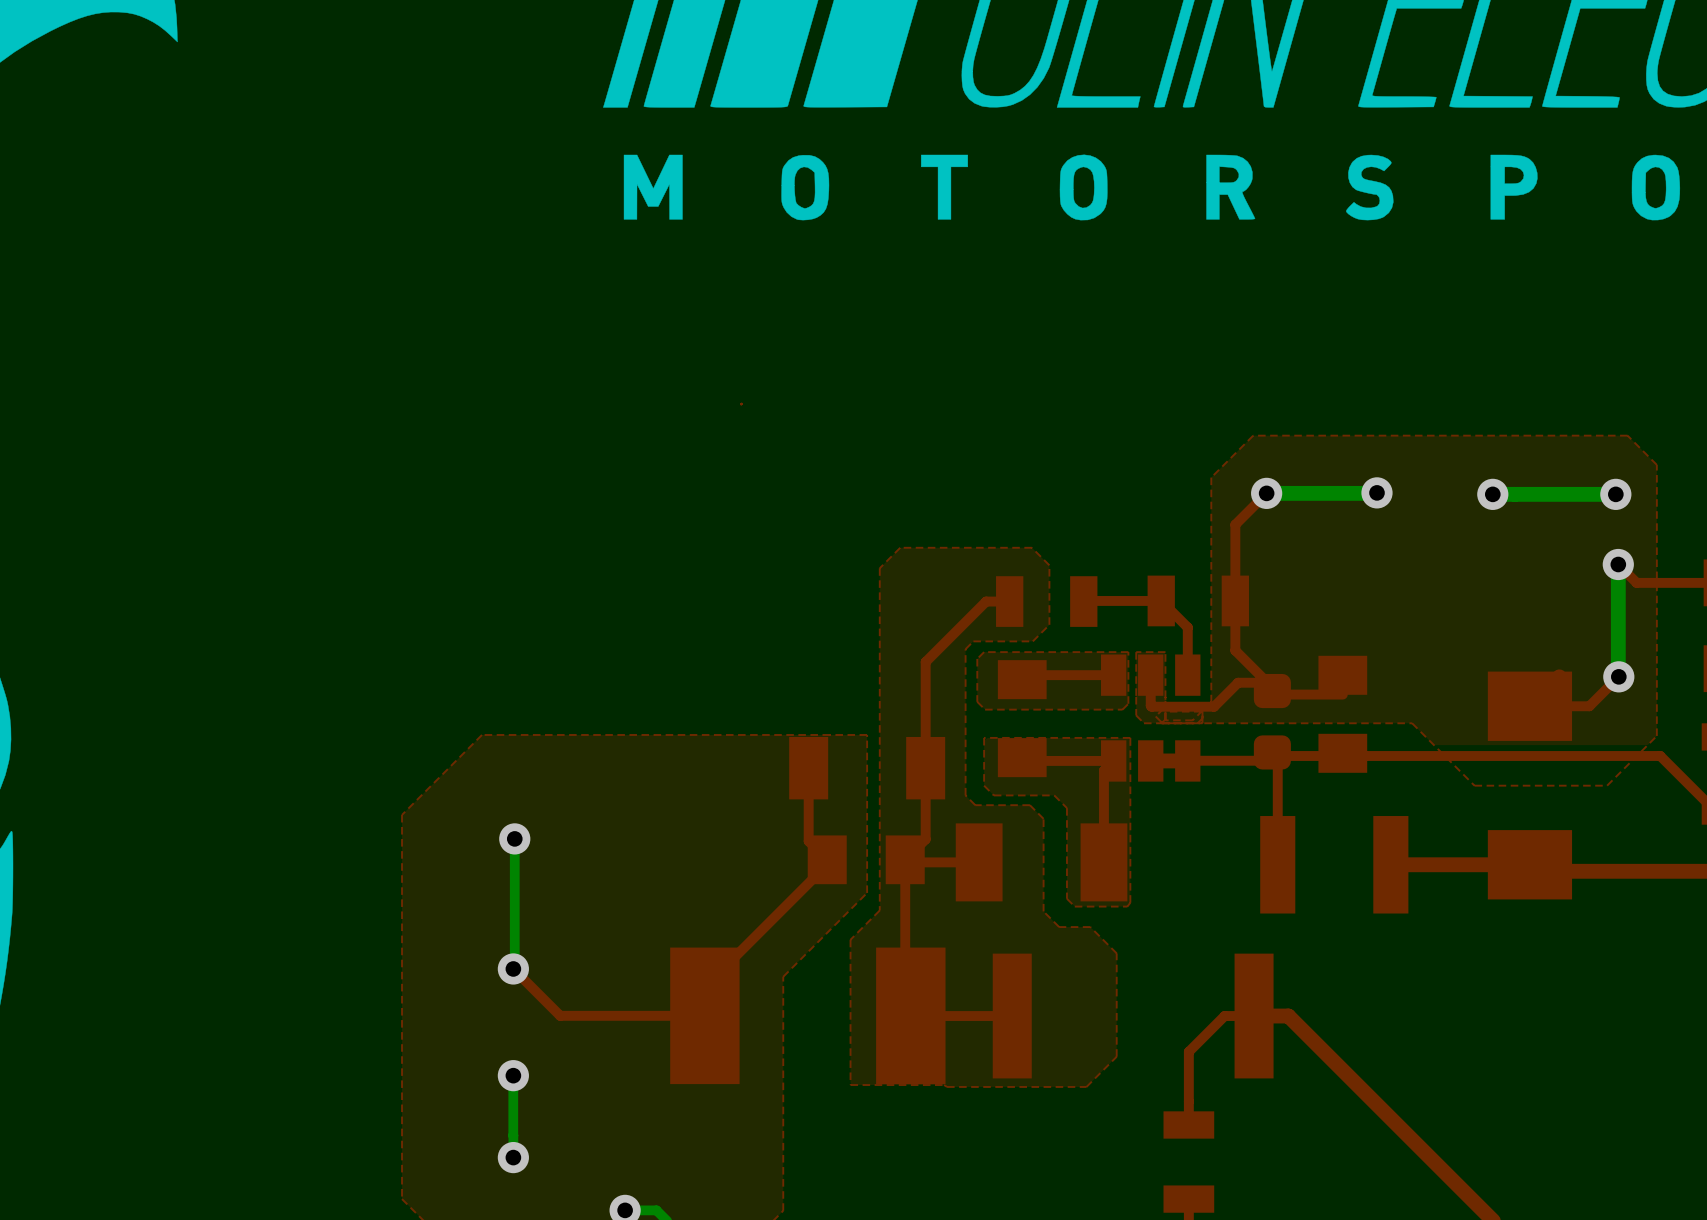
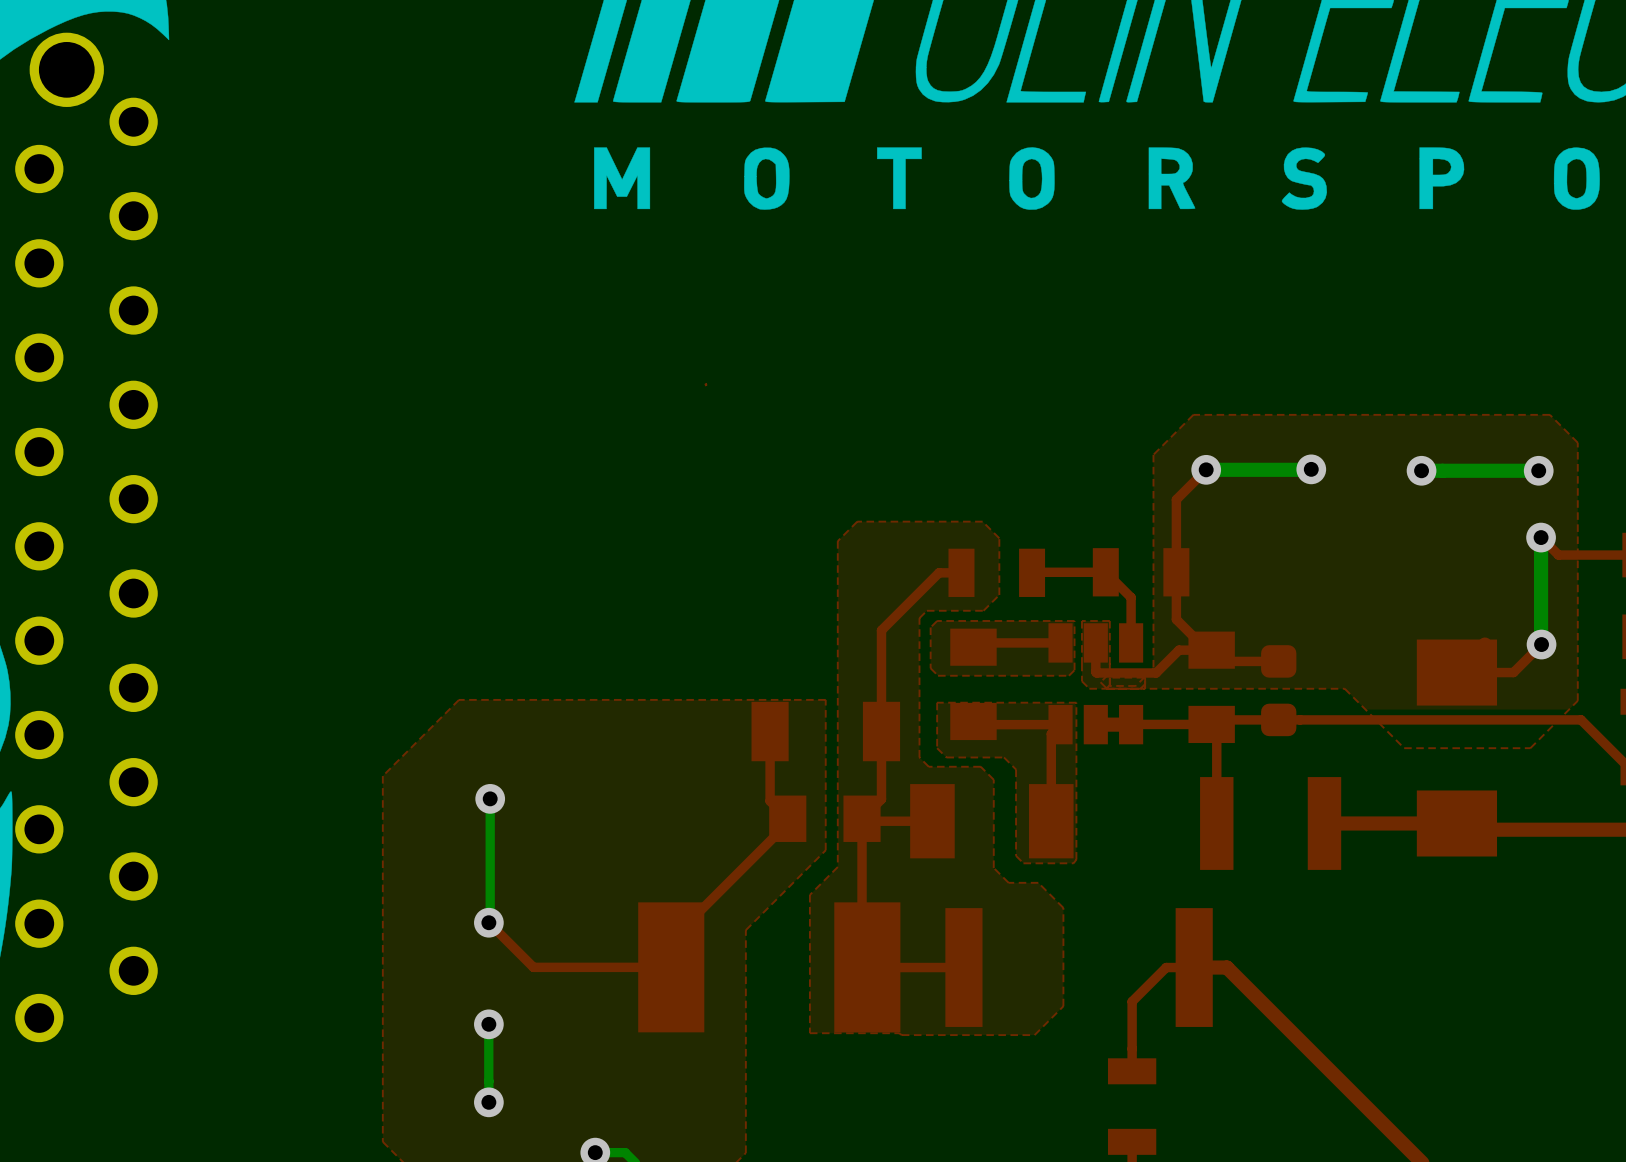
part: none -> (86, 537)
part footprint: [1318, 655, 1368, 773] -> [1261, 645, 1297, 737]
part footprint: [1253, 673, 1291, 770] -> [1188, 631, 1235, 744]

